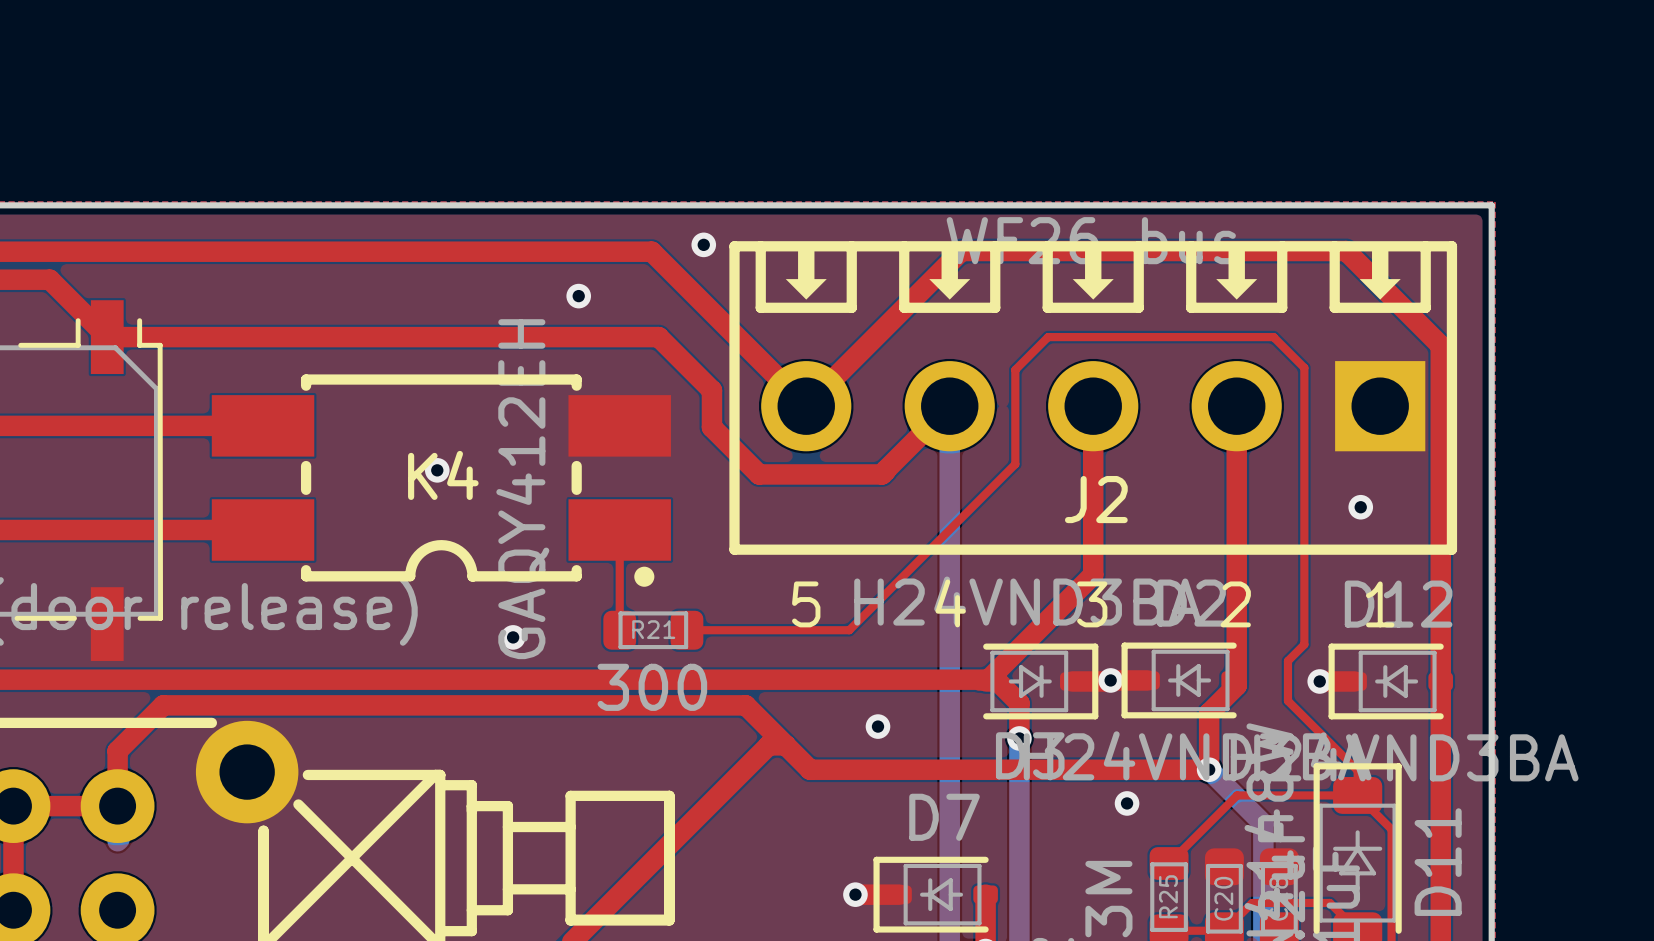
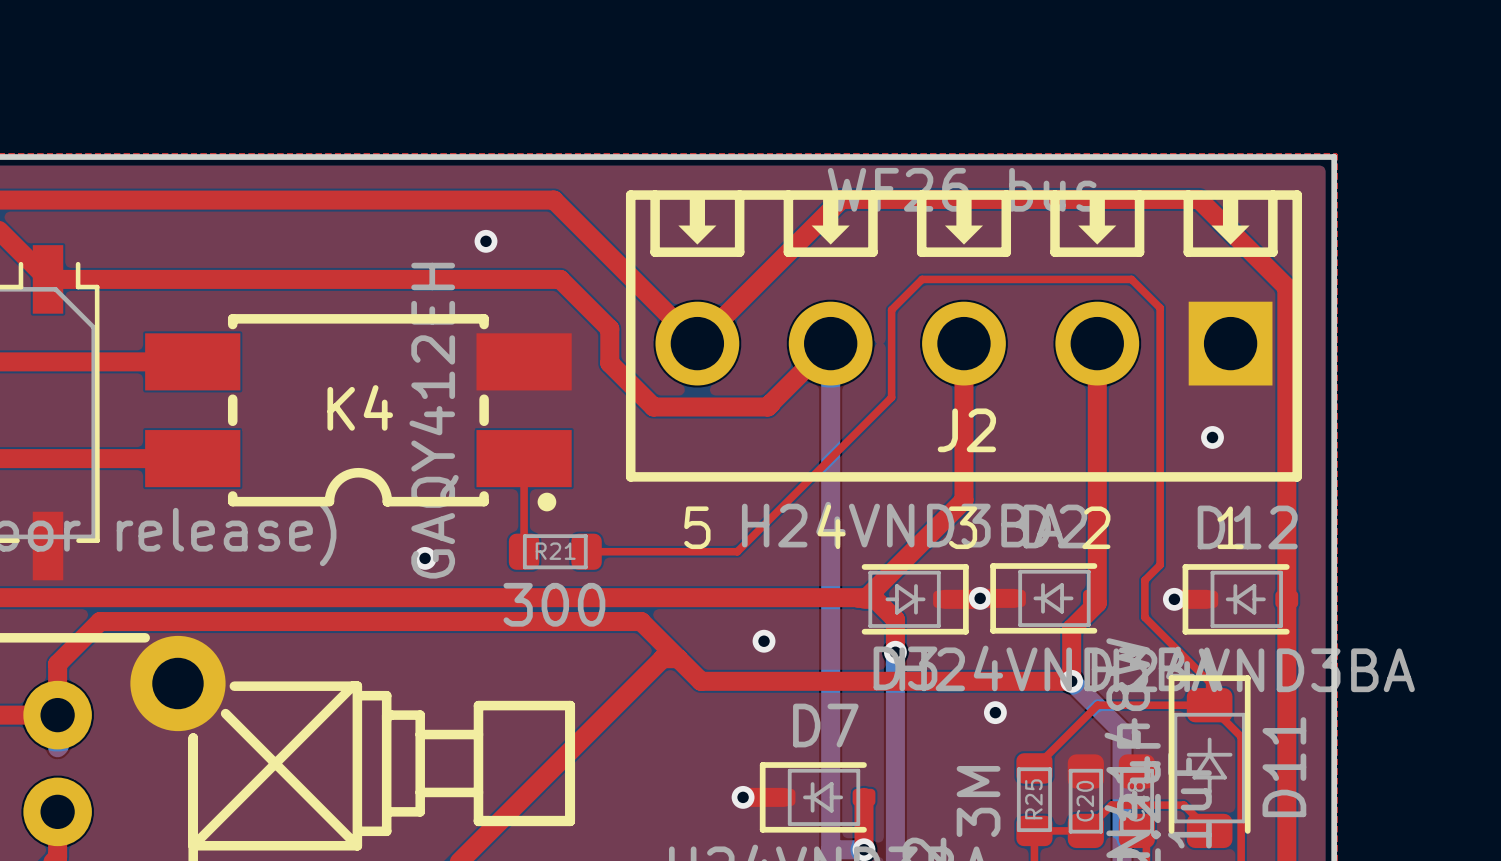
via: (703, 244) -> none
via: (437, 470) -> none

